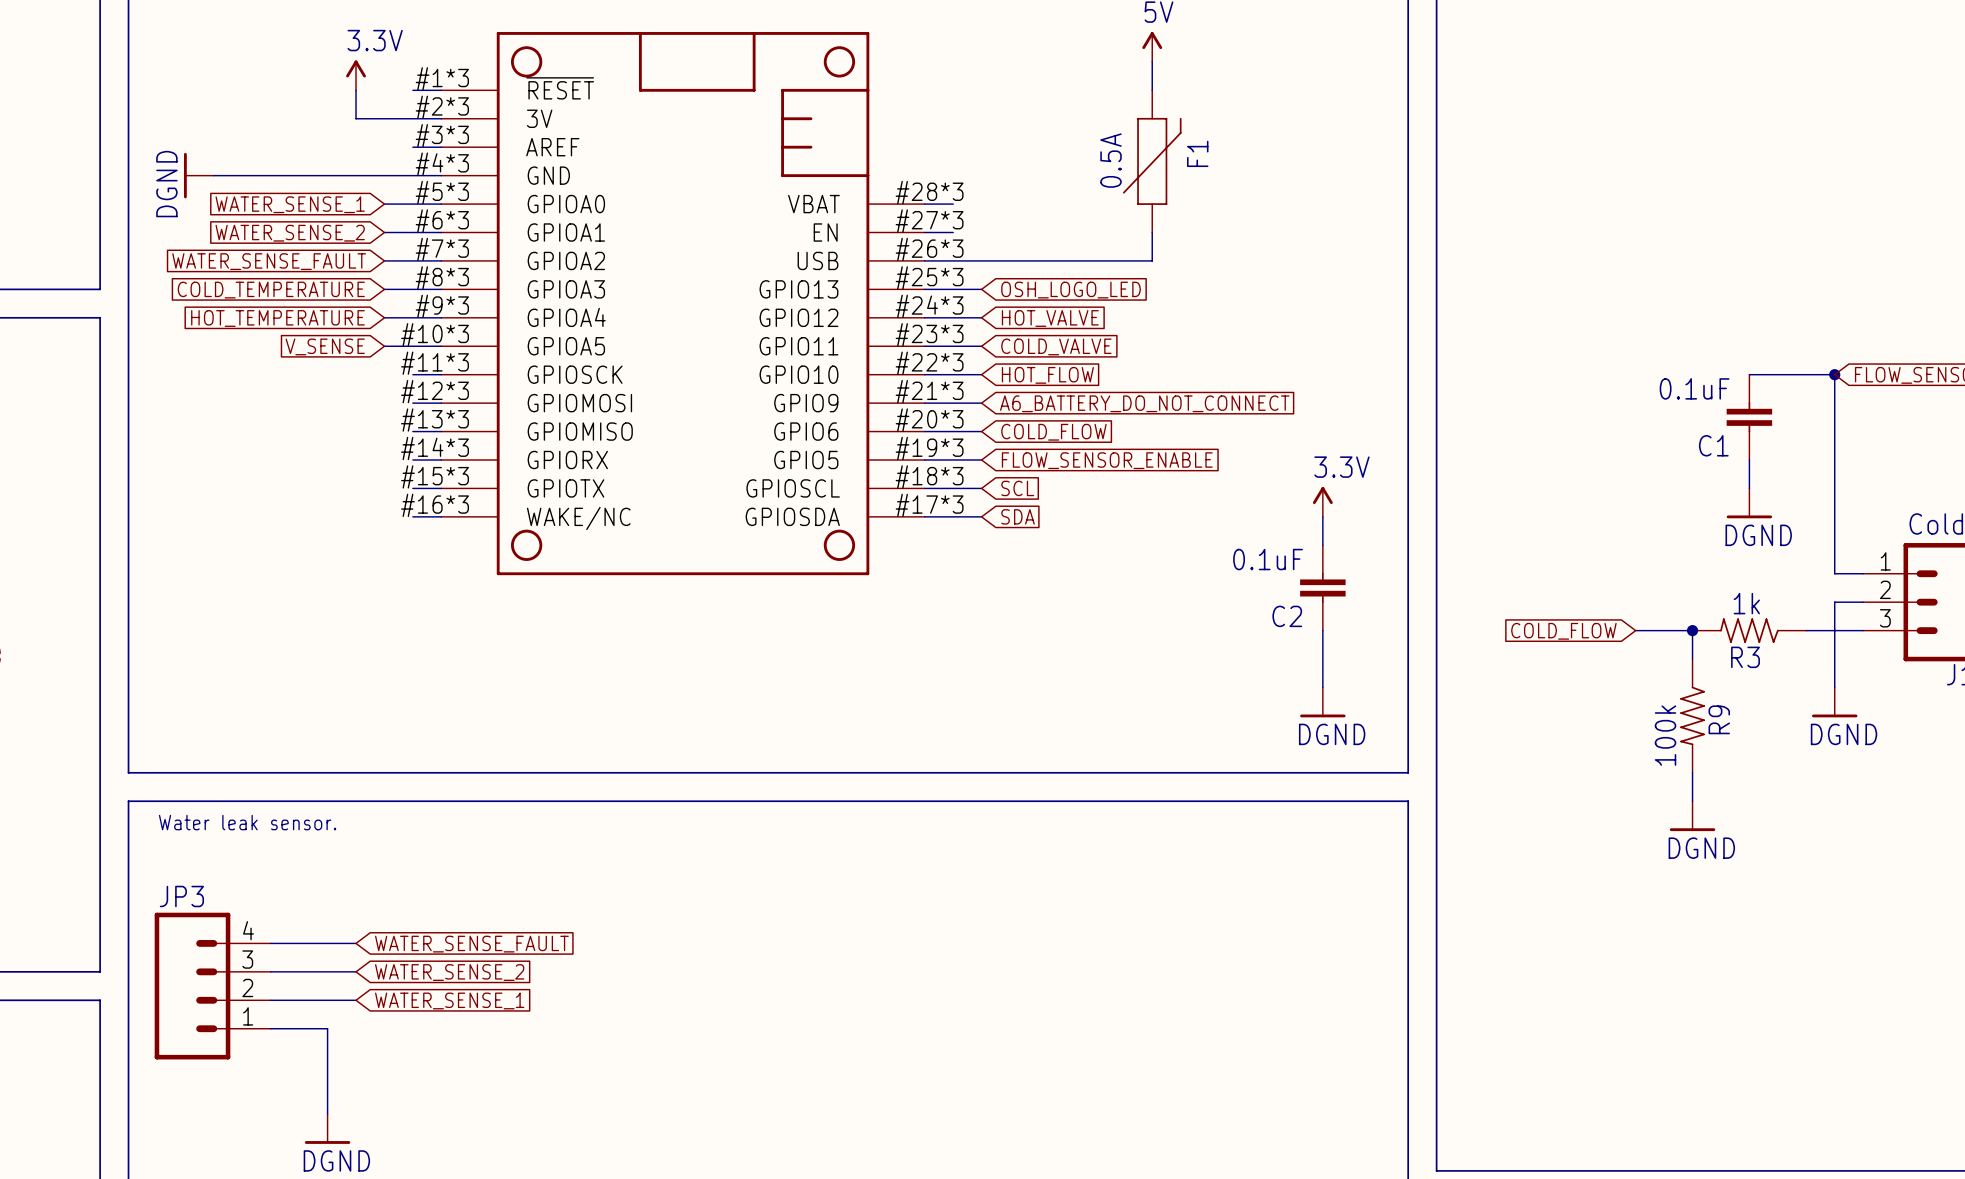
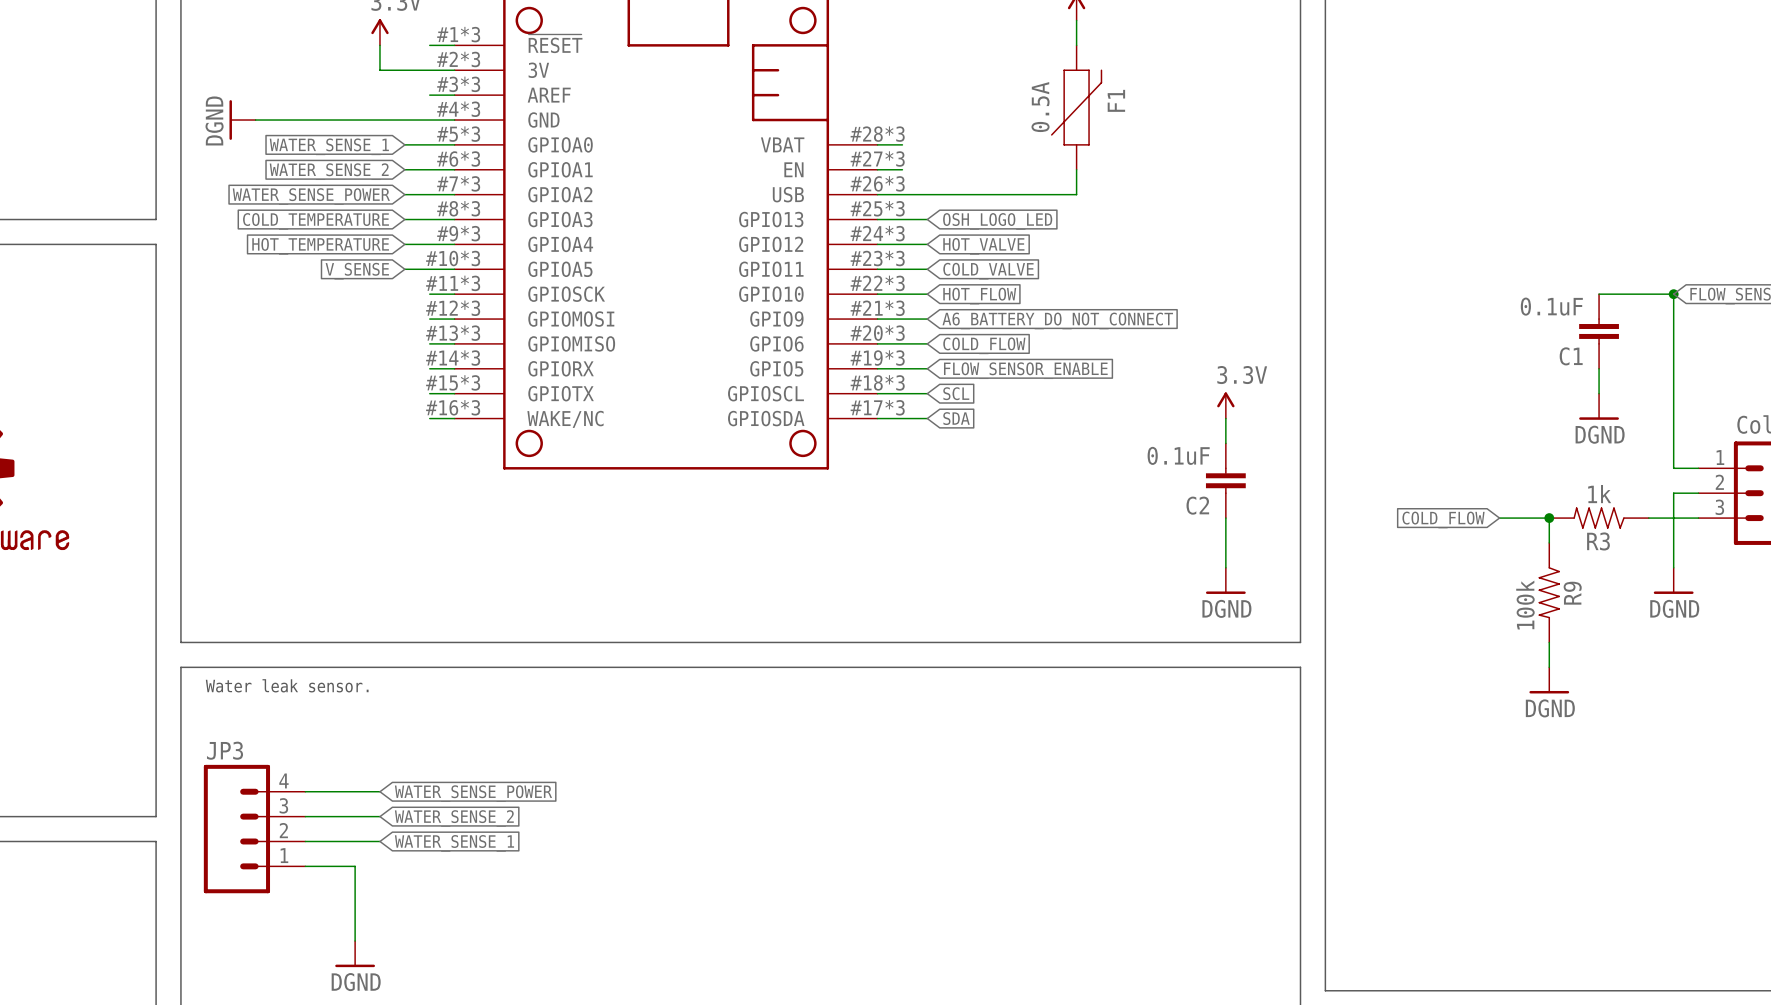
global label: WATER_SENSE_FAULT (269, 261) -> WATER_SENSE_POWER (311, 196)
global label: WATER_SENSE_FAULT (471, 944) -> WATER_SENSE_POWER (473, 793)

